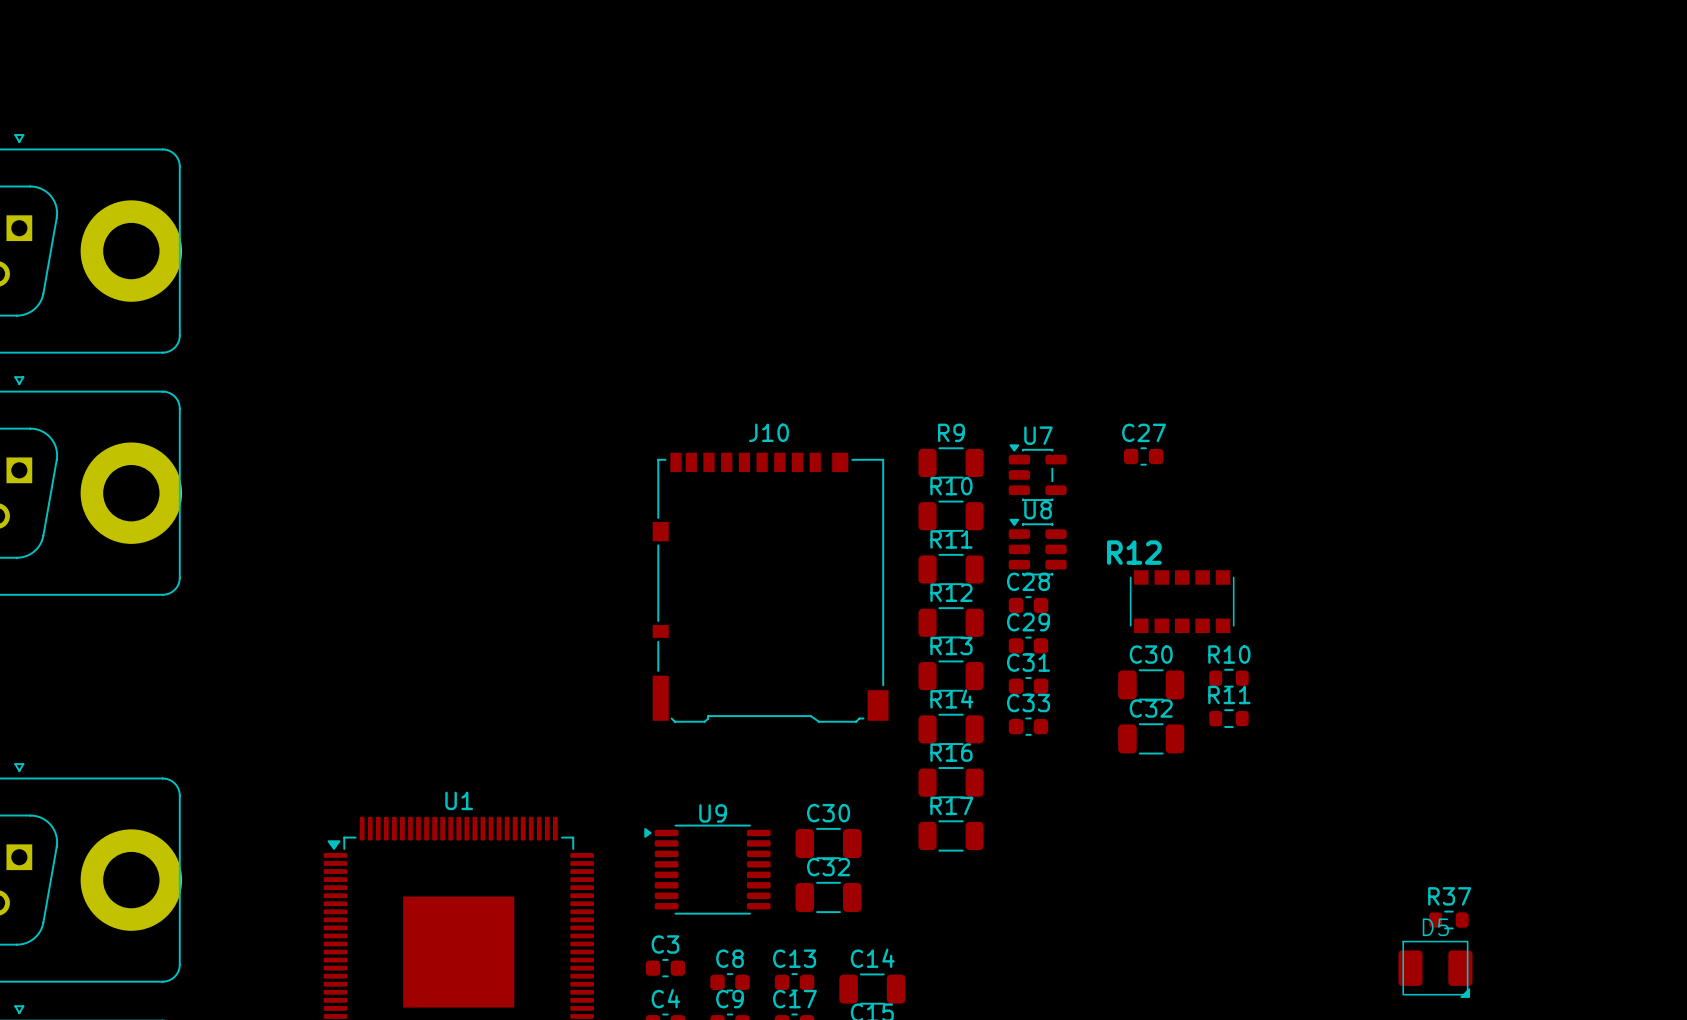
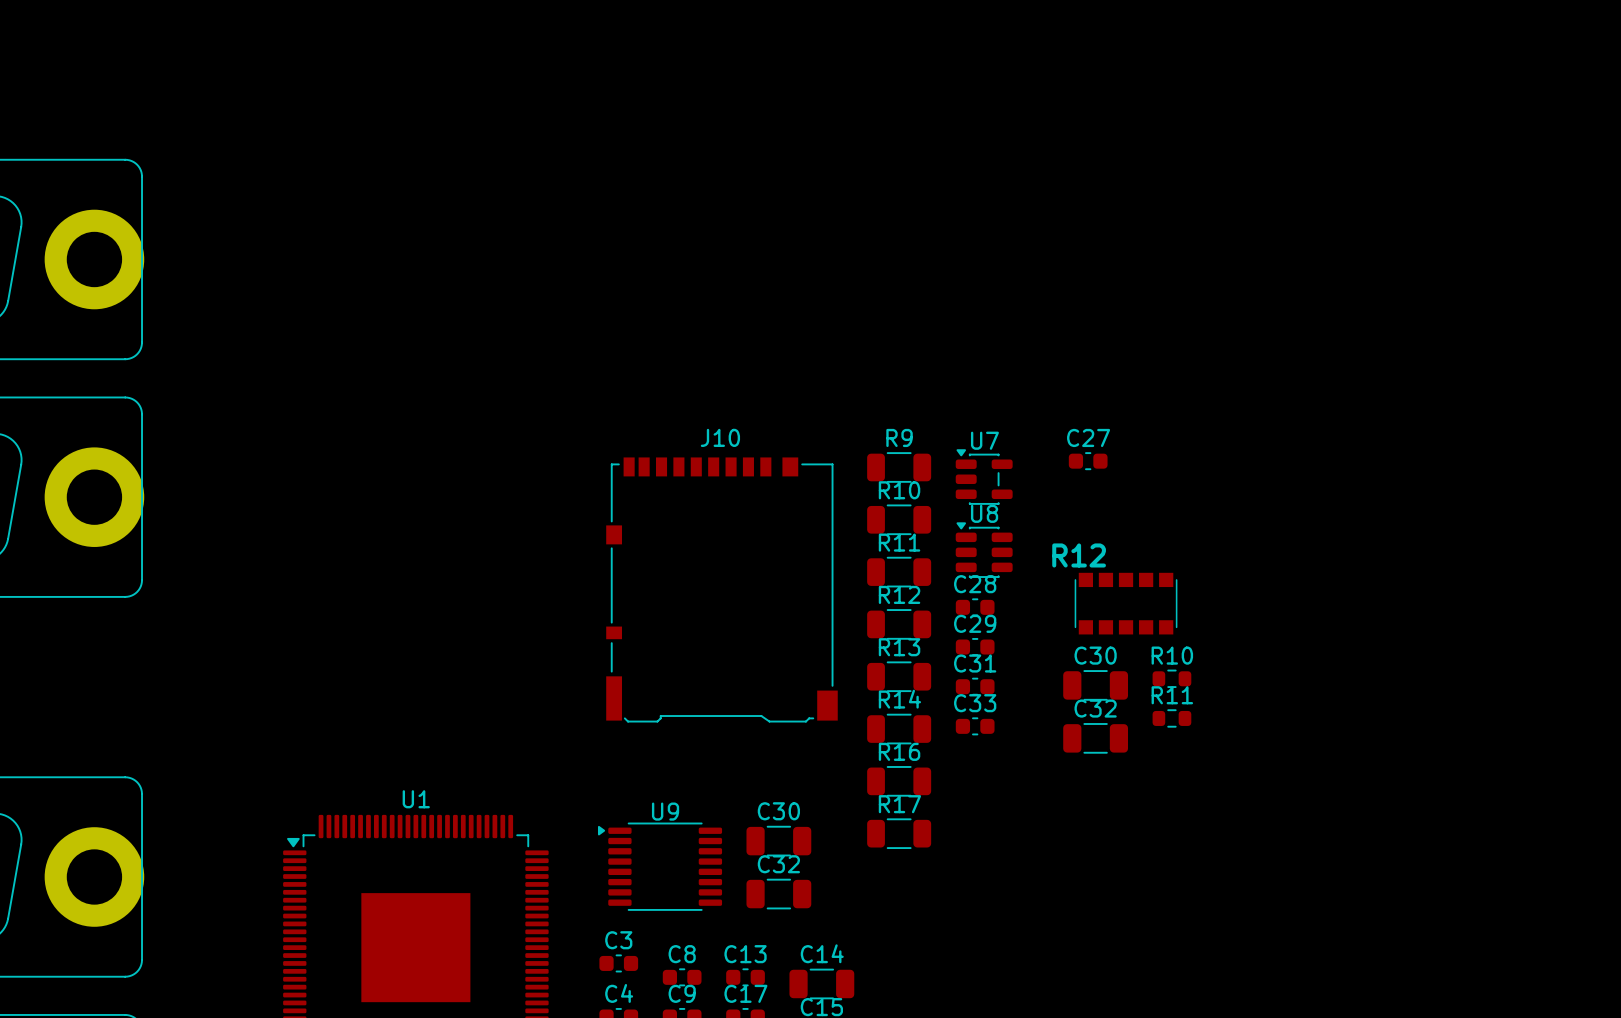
R37: (1448, 920) -> none
D5: (1435, 969) -> none

